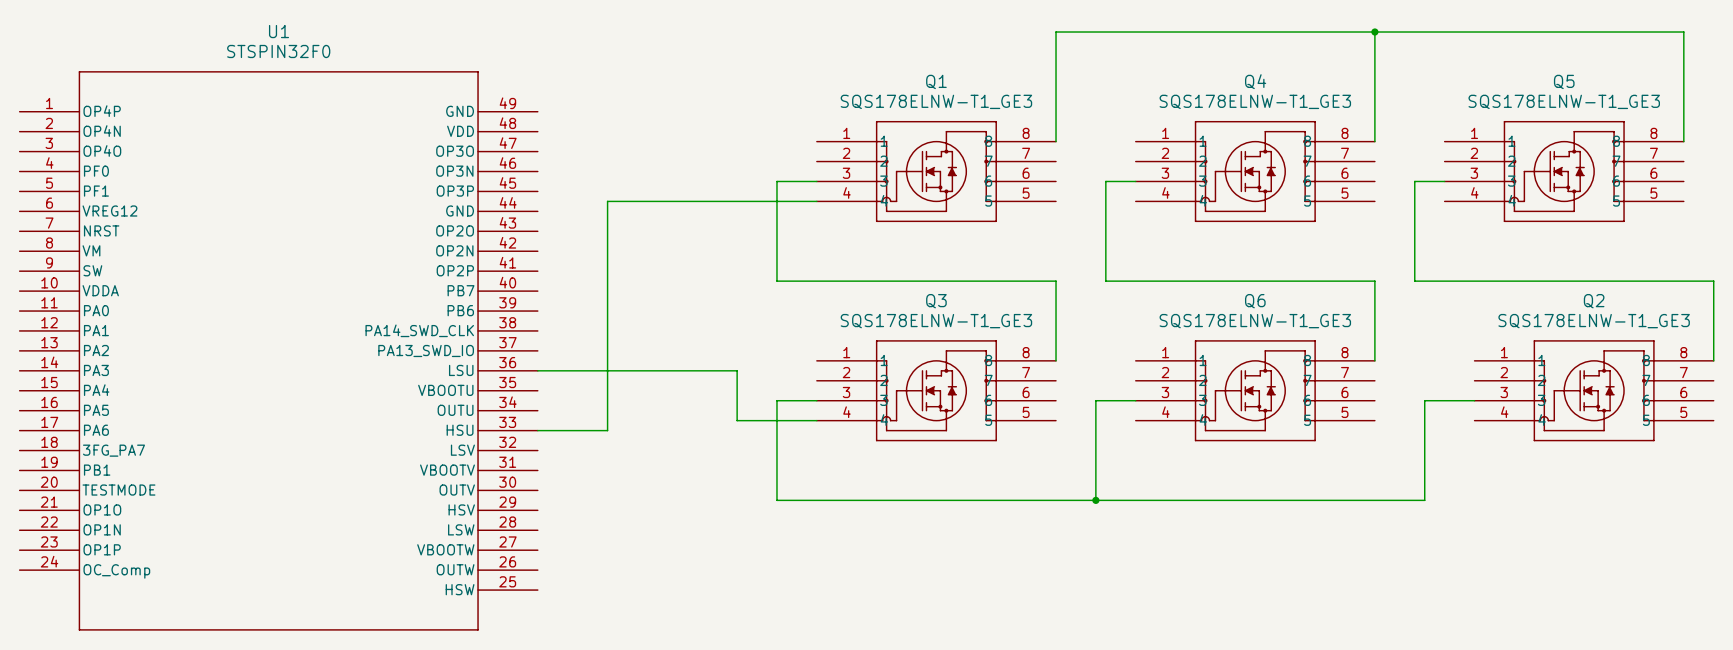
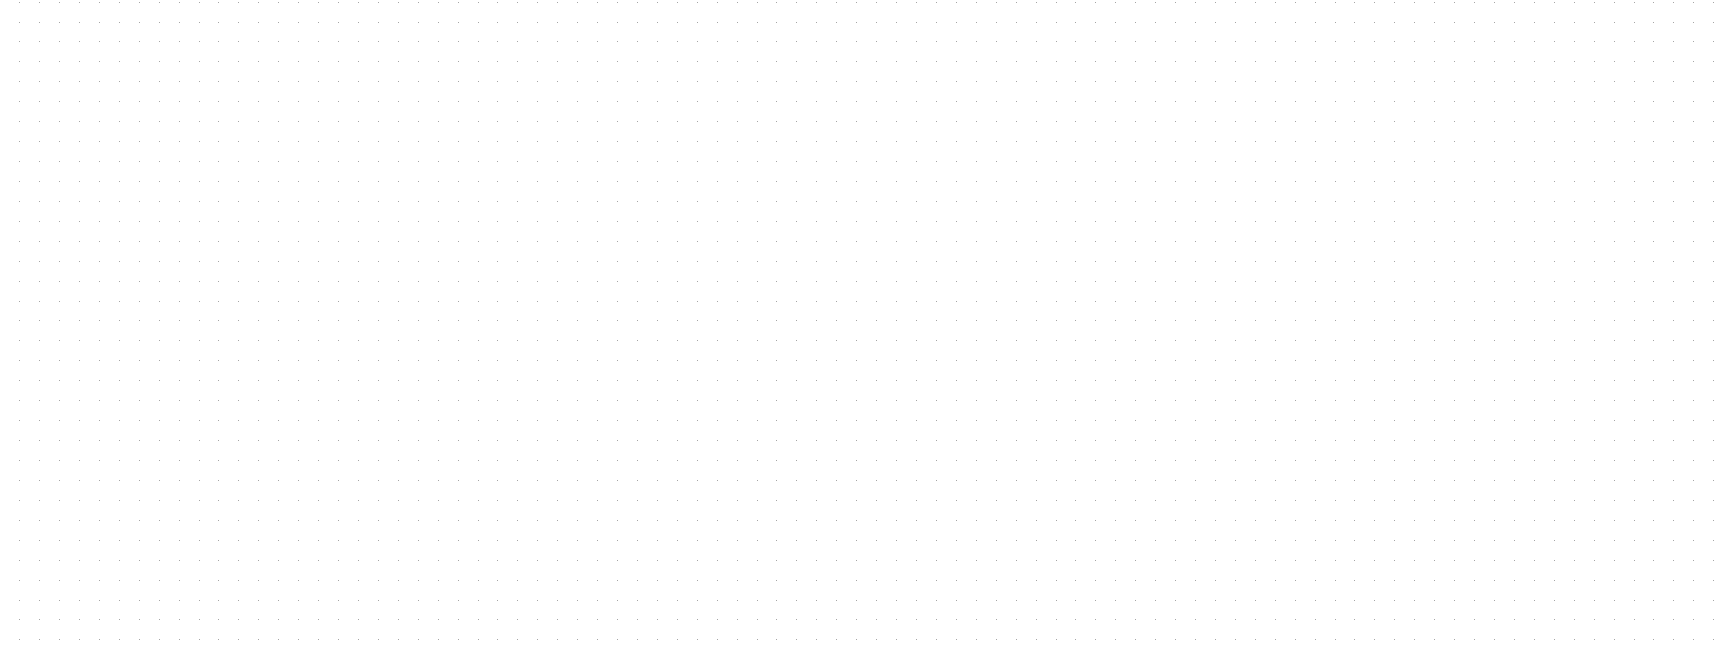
wire: (1374, 32) (1374, 141) -> none
junction: (1374, 32) -> none
wire: (1056, 141) (1056, 32) (1683, 32) (1683, 141) -> none
Q1: SQS178ELNW-T1_GE3 (936, 171) -> none
Q4: SQS178ELNW-T1_GE3 (1255, 171) -> none
Q5: SQS178ELNW-T1_GE3 (1564, 171) -> none
wire: (816, 181) (776, 181) (776, 281) (1056, 281) (1056, 360) -> none
wire: (1135, 181) (1105, 181) (1105, 281) (1374, 281) (1374, 360) -> none
wire: (1444, 181) (1414, 181) (1414, 281) (1713, 281) (1713, 360) -> none
wire: (816, 201) (607, 201) (607, 430) (537, 430) -> none
U1: STSPIN32F0 (278, 350) -> none
wire: (537, 370) (737, 370) (737, 420) (816, 420) -> none
Q3: SQS178ELNW-T1_GE3 (936, 390) -> none
Q6: SQS178ELNW-T1_GE3 (1255, 390) -> none
Q2: SQS178ELNW-T1_GE3 (1594, 390) -> none
wire: (816, 400) (776, 400) (776, 500) (1424, 500) (1424, 400) (1474, 400) -> none
wire: (1135, 400) (1095, 400) (1095, 500) -> none
junction: (1095, 500) -> none

